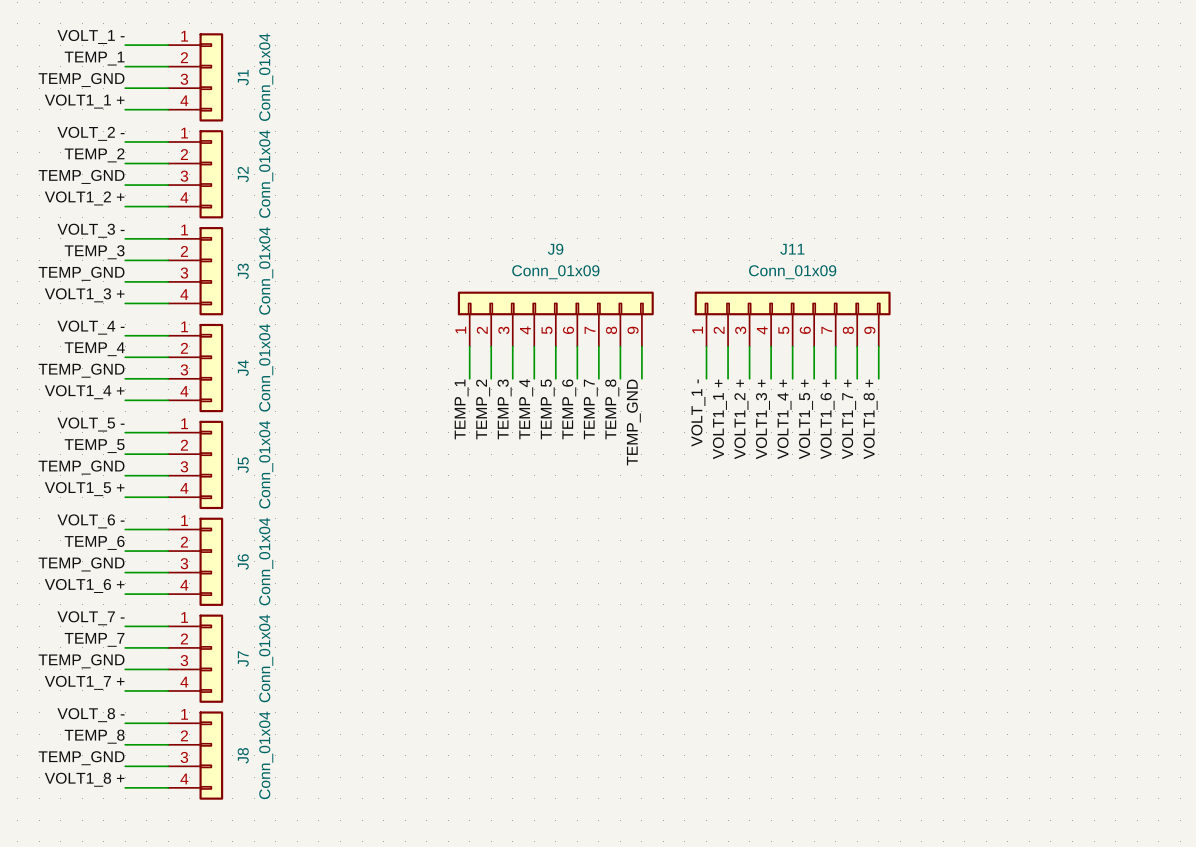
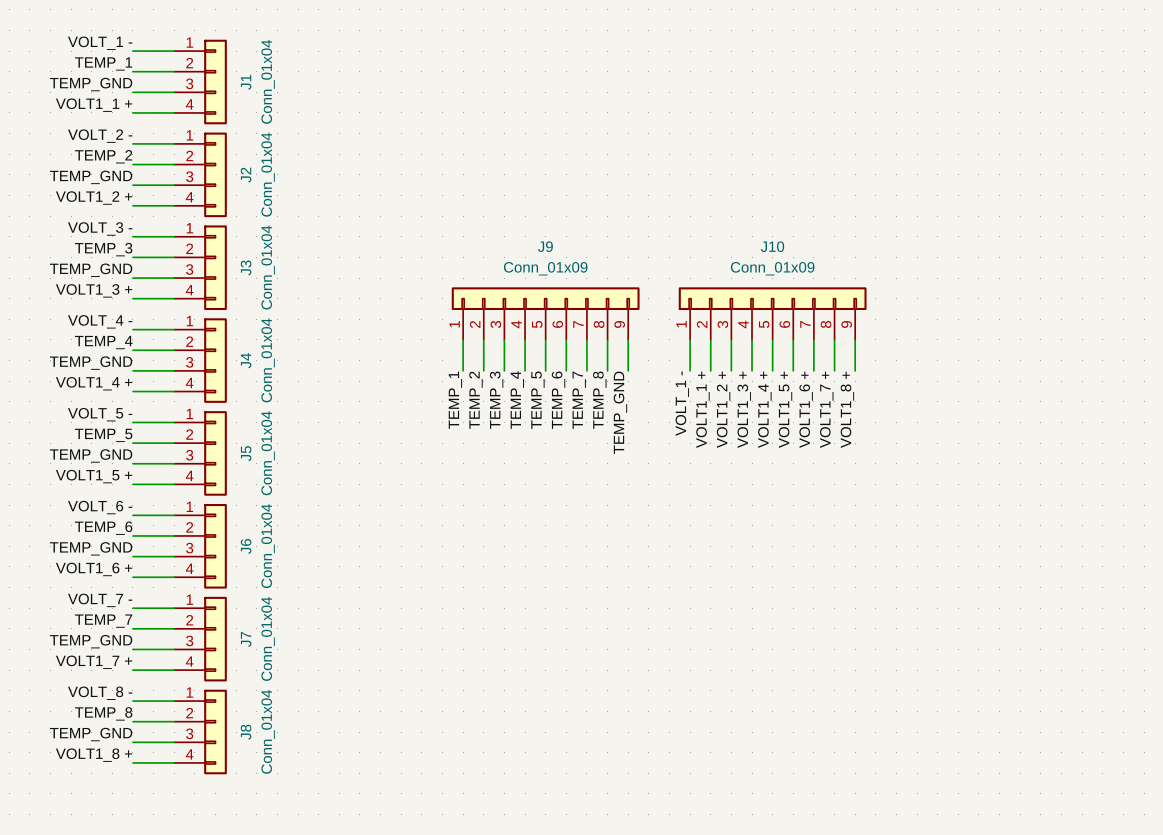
J11 name: J11 (792, 249) -> J10 (772, 246)

